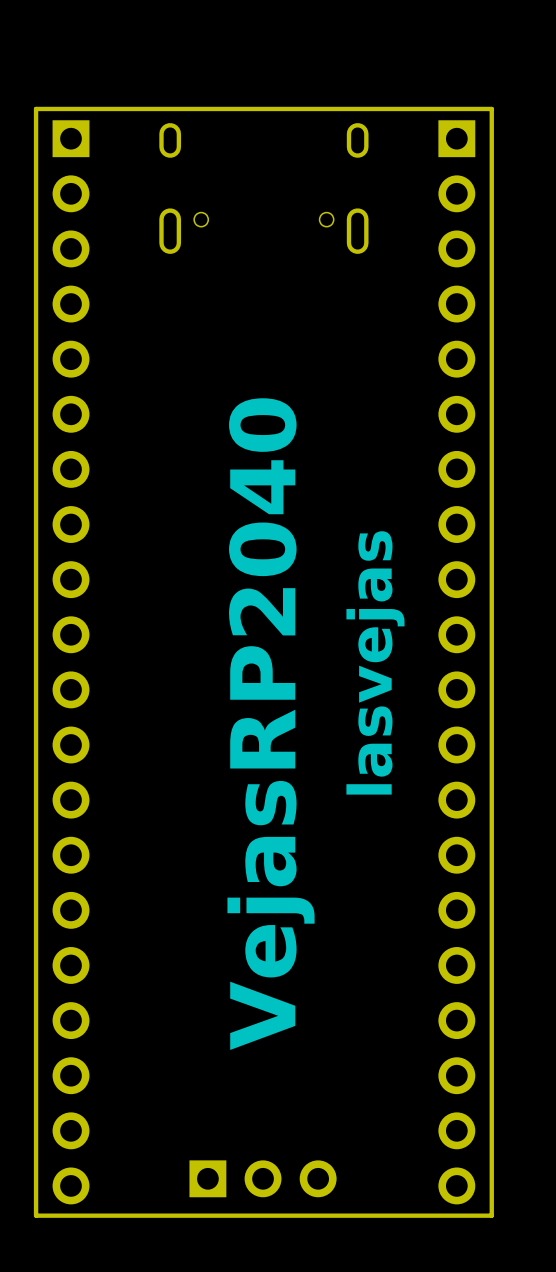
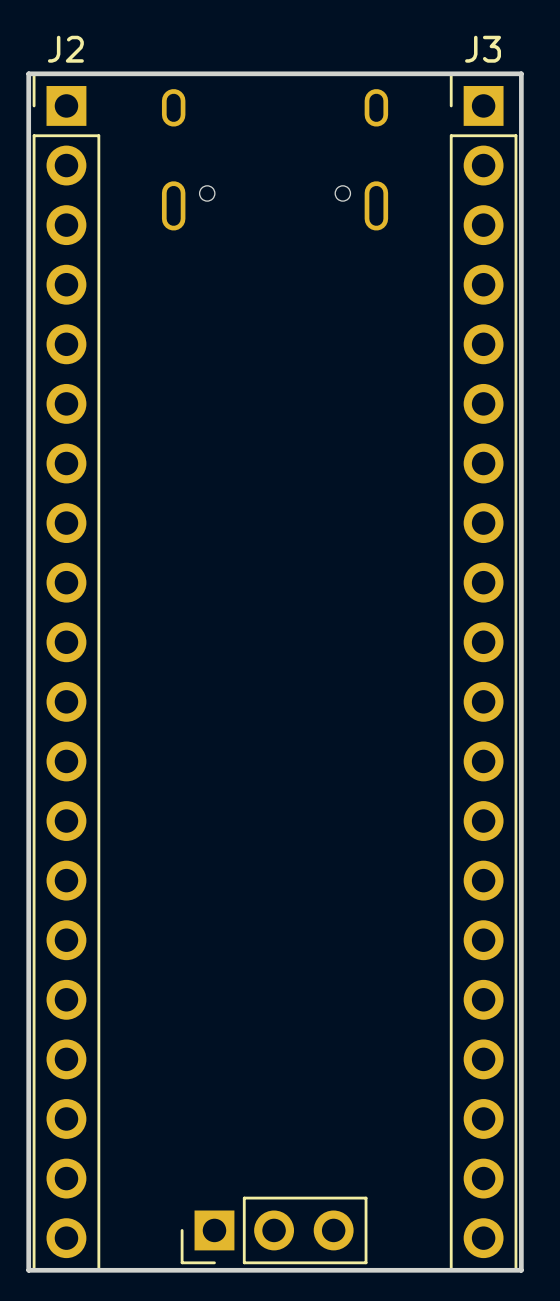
J2: none -> (66, 672)
text: lasvejas (375, 662) -> none
J3: none -> (483, 672)
text: VejasRP2040 (271, 724) -> none
part footprint: [189, 1160, 337, 1198] -> [180, 1196, 368, 1265]

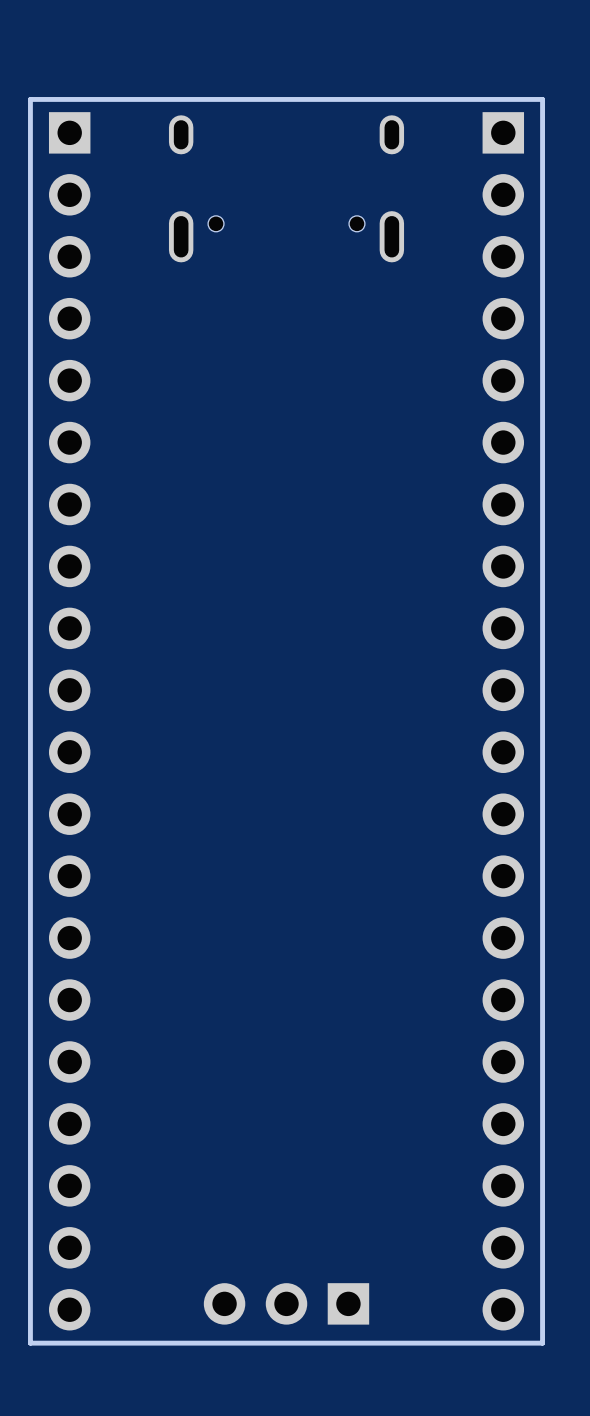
J2 side: bottom (66, 672) -> top (69, 721)
J3 side: bottom (483, 672) -> top (503, 721)
part side: bottom (274, 1230) -> top (286, 1303)

